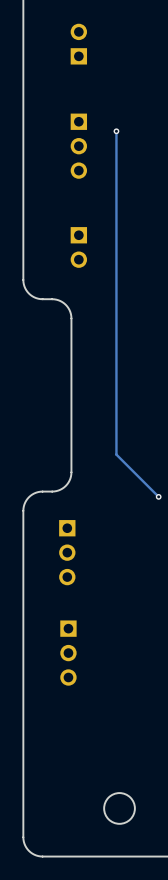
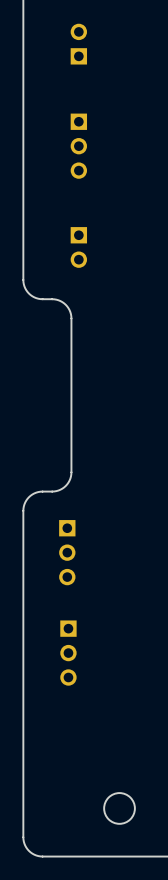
track: (116, 131) (116, 454) (158, 496) -> none
via: (116, 131) -> none
via: (158, 496) -> none

